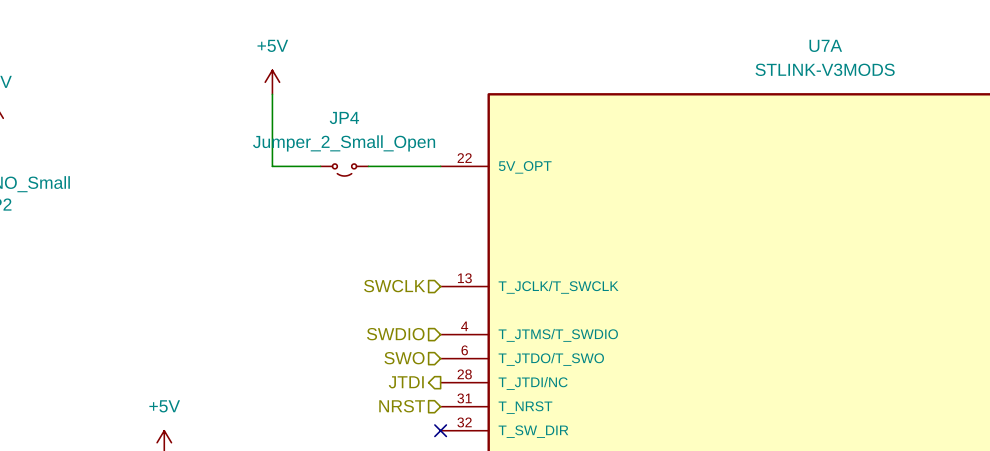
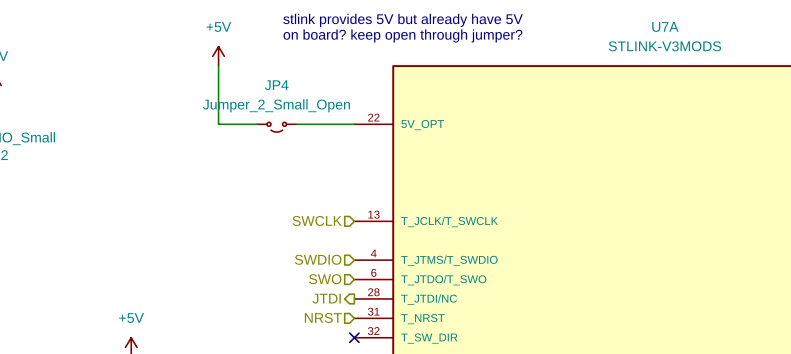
text: none -> stlink provides 5V but already have 5V (403, 20)
text: none -> on board? keep open through jumper? (402, 35)

